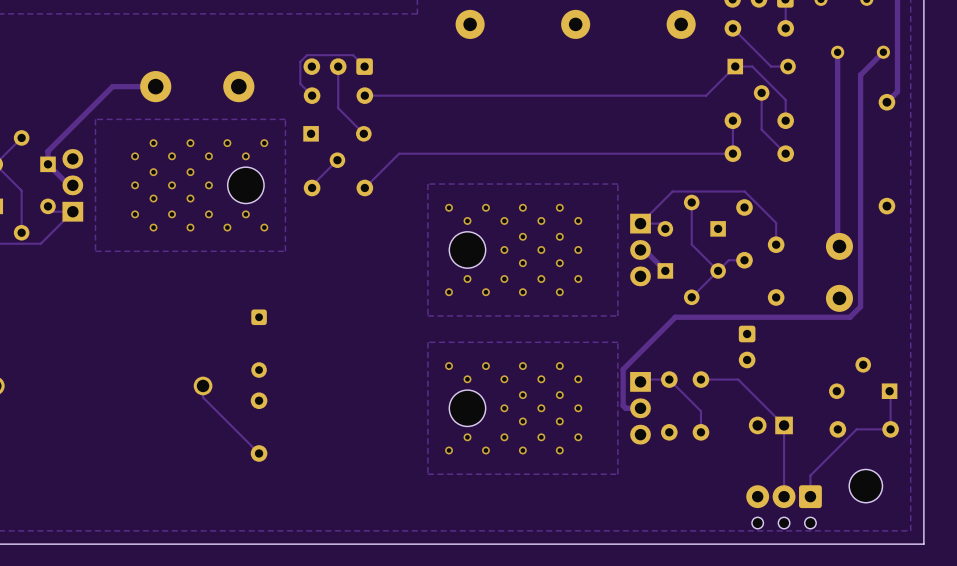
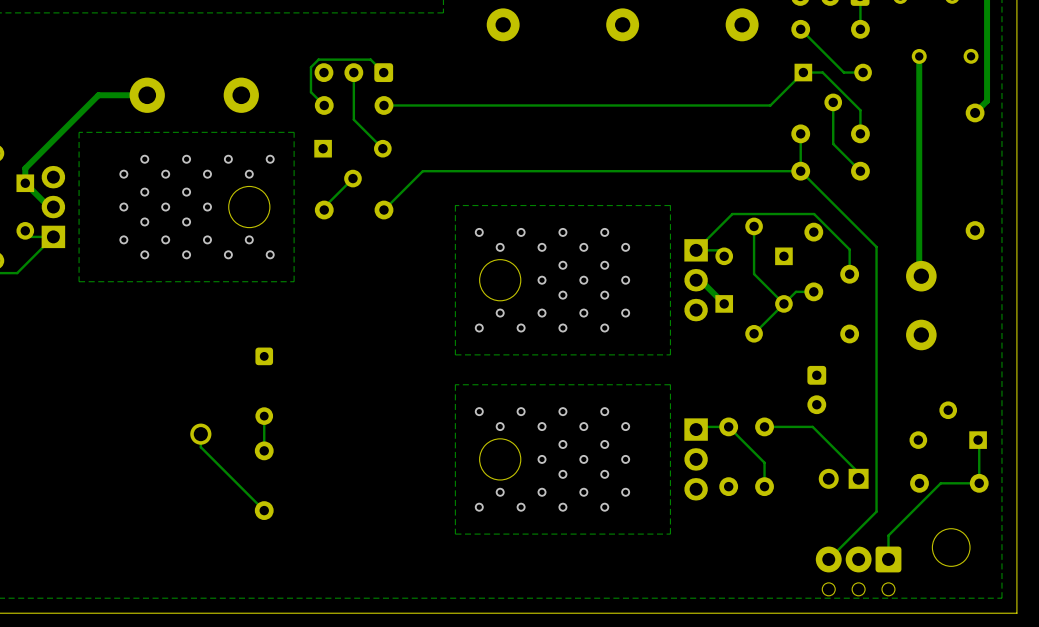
track: (883, 52) (860, 75) (860, 306) (850, 317) (675, 317) (623, 369) (623, 405) (625, 408) (640, 408) -> none
track: none -> (800, 171) (876, 247) (876, 511) (828, 559)
track: none -> (264, 416) (264, 450)
track: (738, 379) (784, 425) (784, 496) -> (806, 426) (812, 426) (858, 472)

